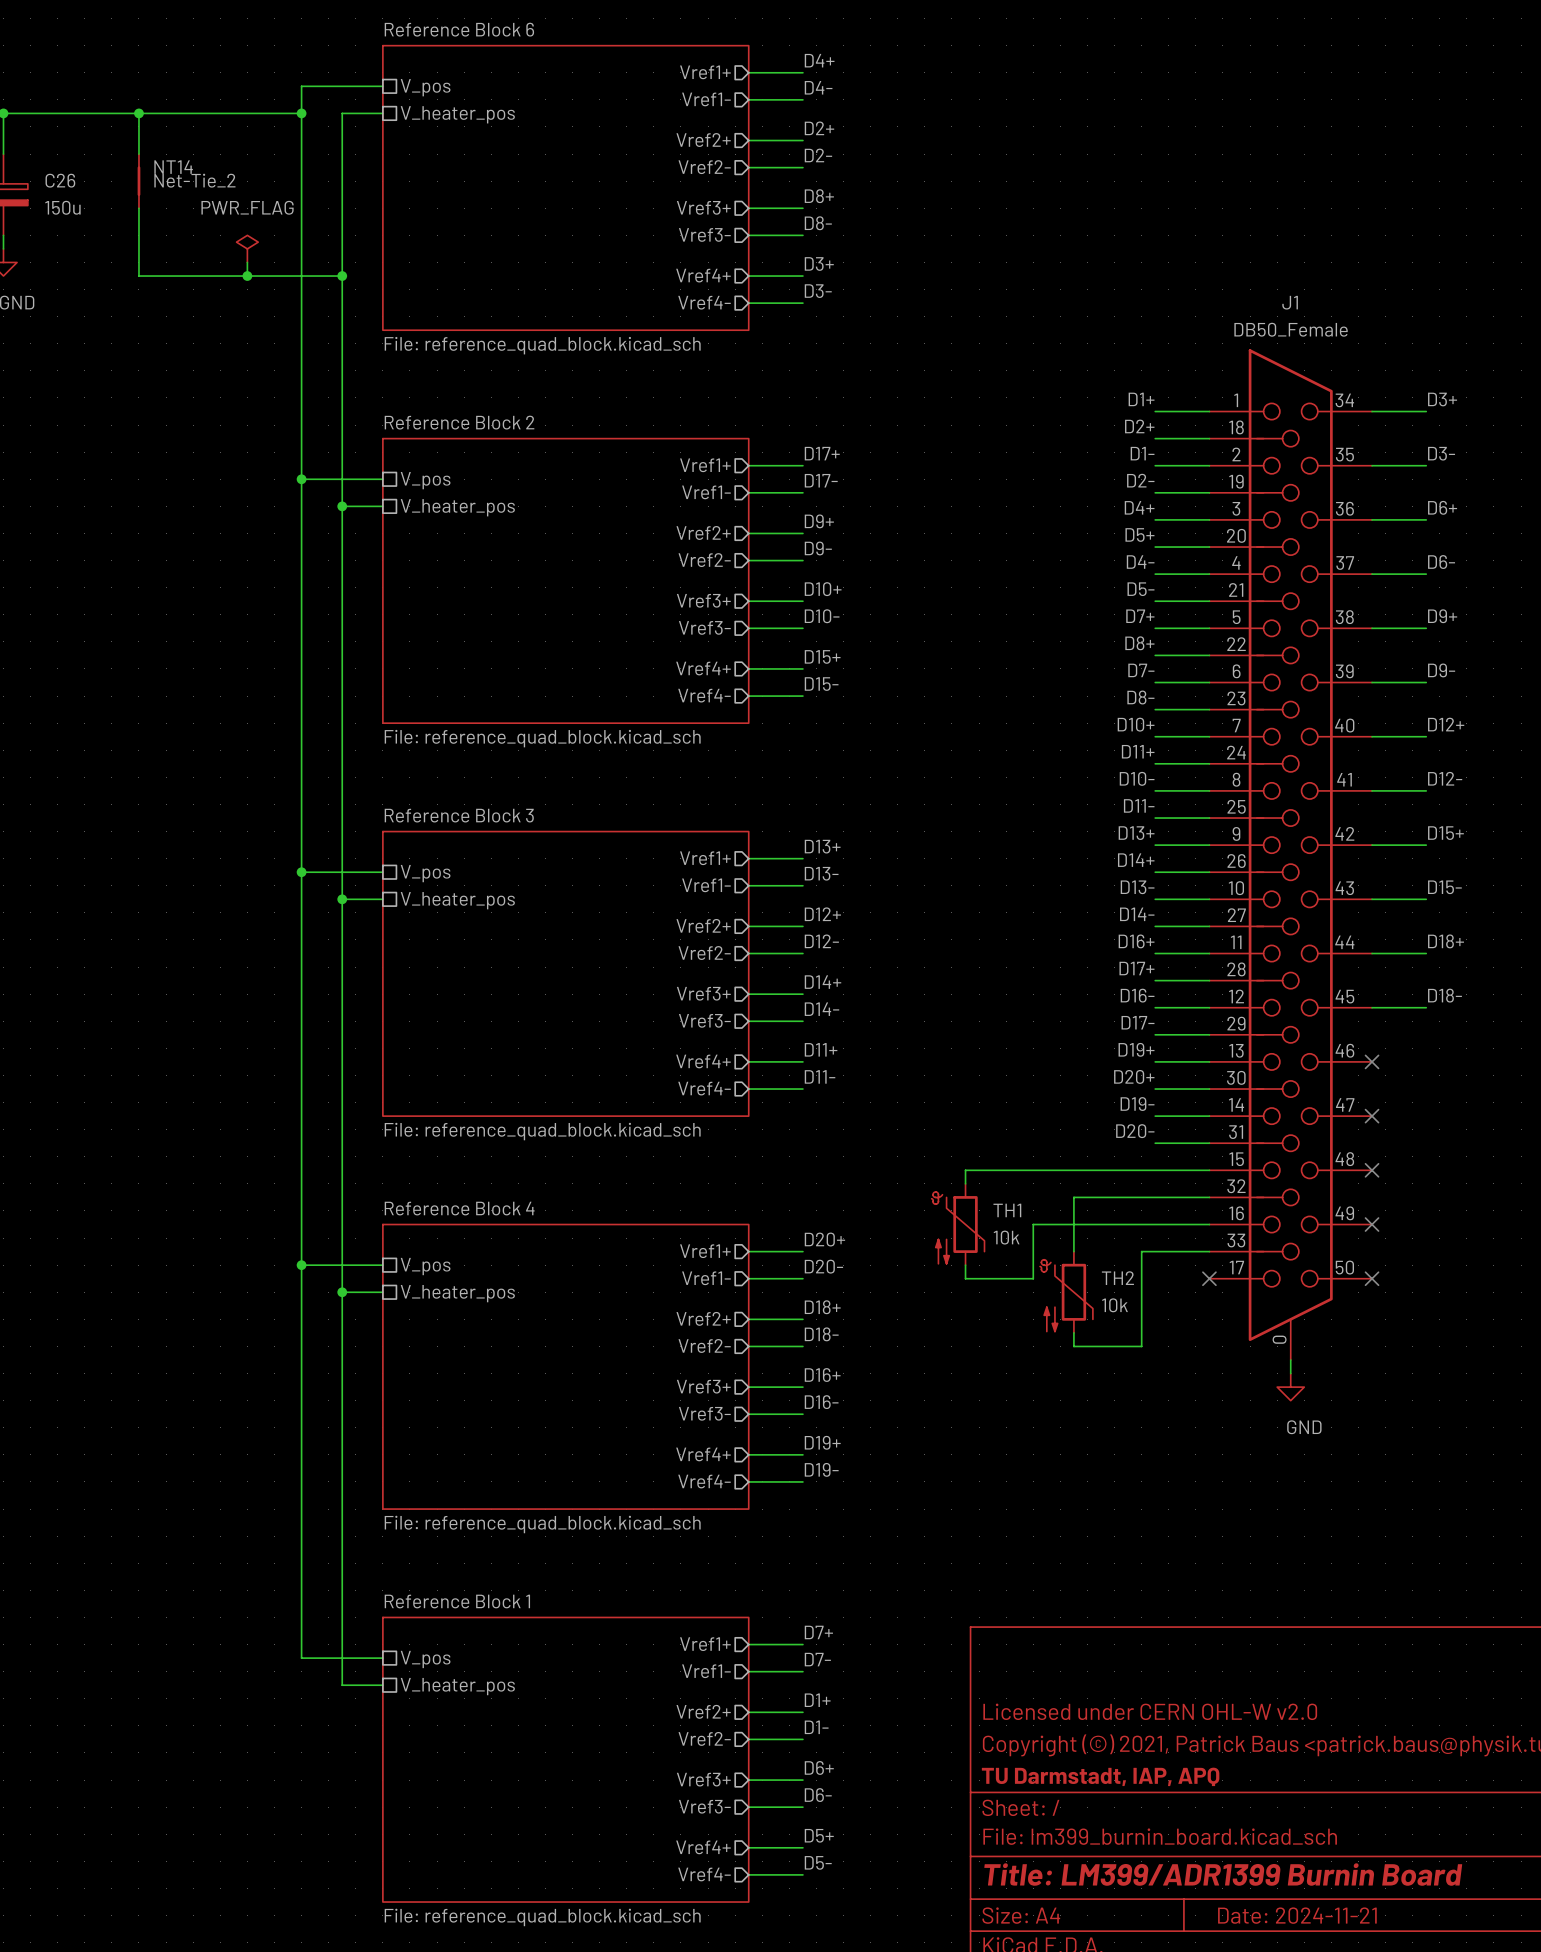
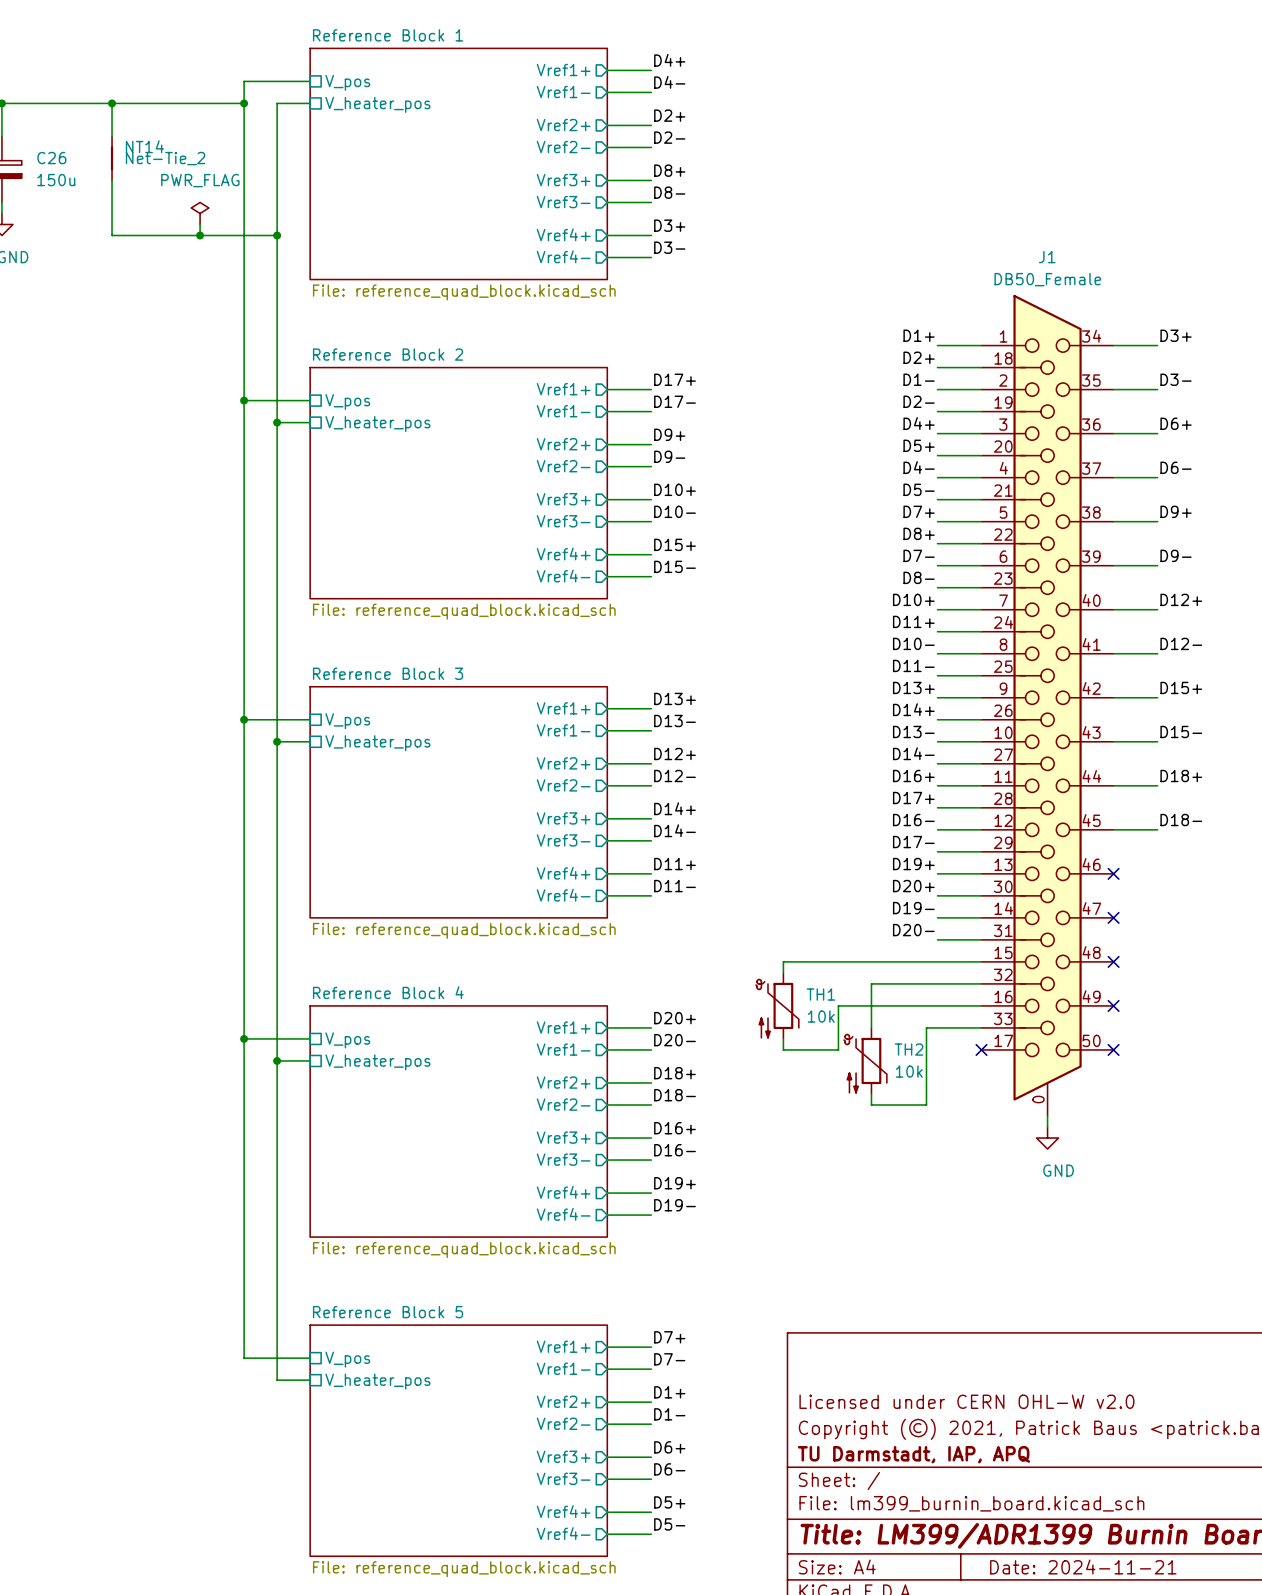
sheet Reference Block 6 name: Reference Block 6 (459, 29) -> Reference Block 1 (388, 35)
sheet Reference Block 1 name: Reference Block 1 (457, 1601) -> Reference Block 5 (388, 1312)

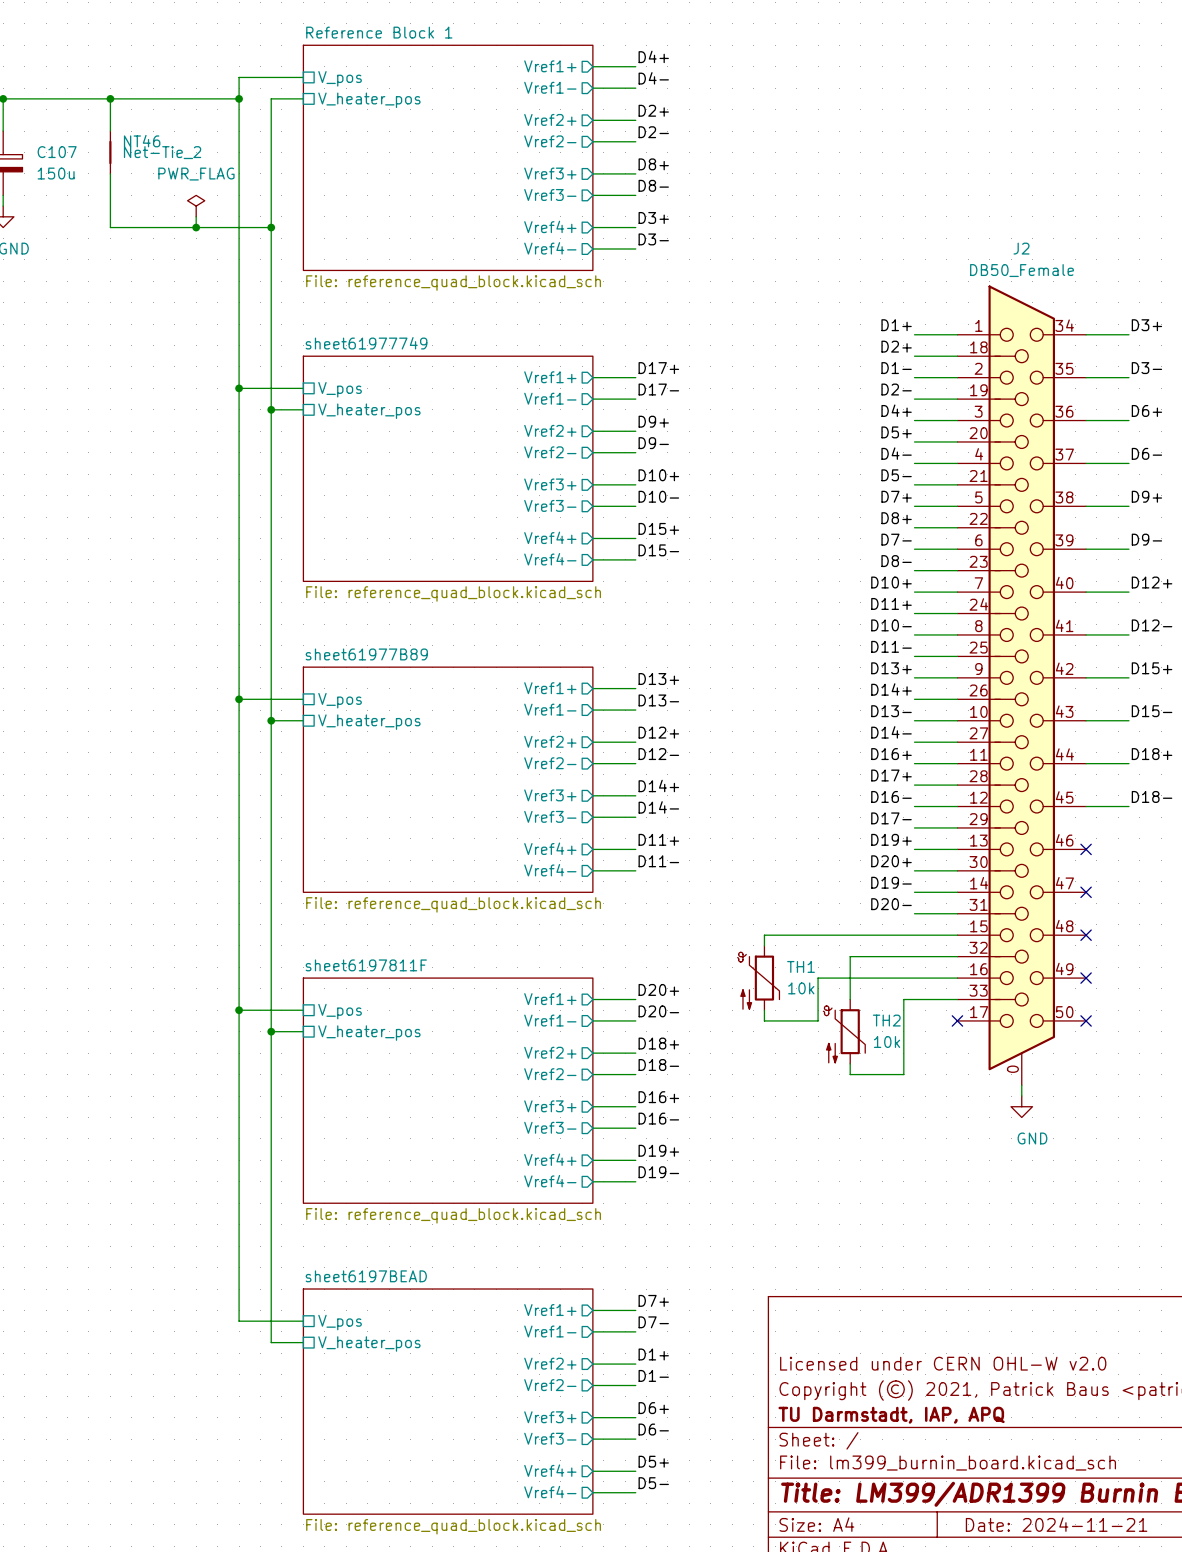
NT14 name: NT14 (144, 146) -> NT46 (142, 141)
C26 name: C26 (51, 158) -> C107 (57, 152)
J1 name: J1 (1047, 257) -> J2 (1021, 248)
sheet Reference Block 2 name: Reference Block 2 (388, 354) -> sheet61977749 (366, 343)
sheet Reference Block 3 name: Reference Block 3 (388, 673) -> sheet61977B89 (366, 654)
sheet Reference Block 4 name: Reference Block 4 (388, 992) -> sheet6197811F (366, 965)
sheet Reference Block 5 name: Reference Block 5 (388, 1312) -> sheet6197BEAD (366, 1276)

